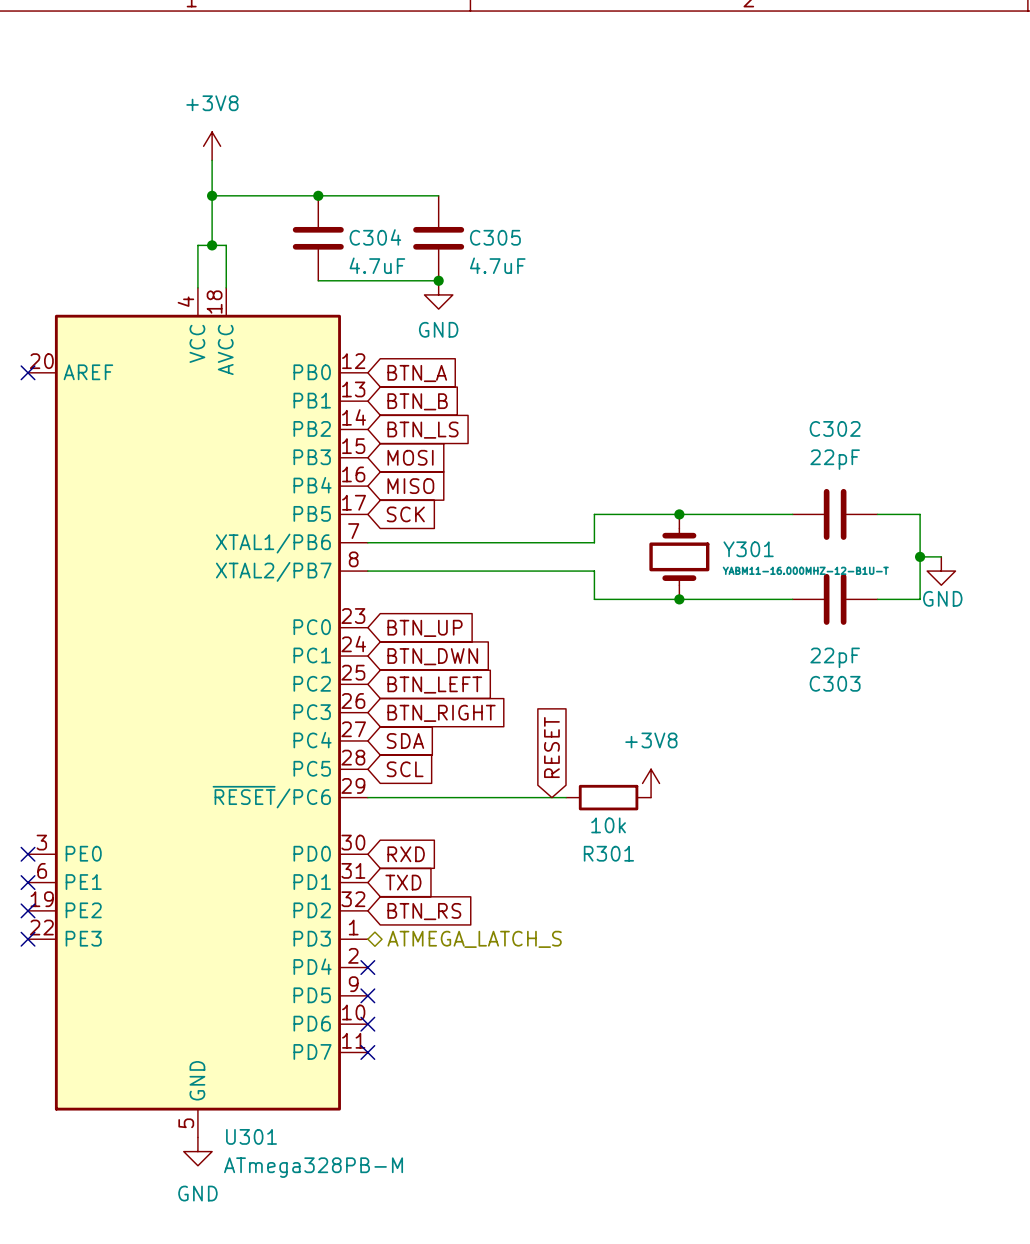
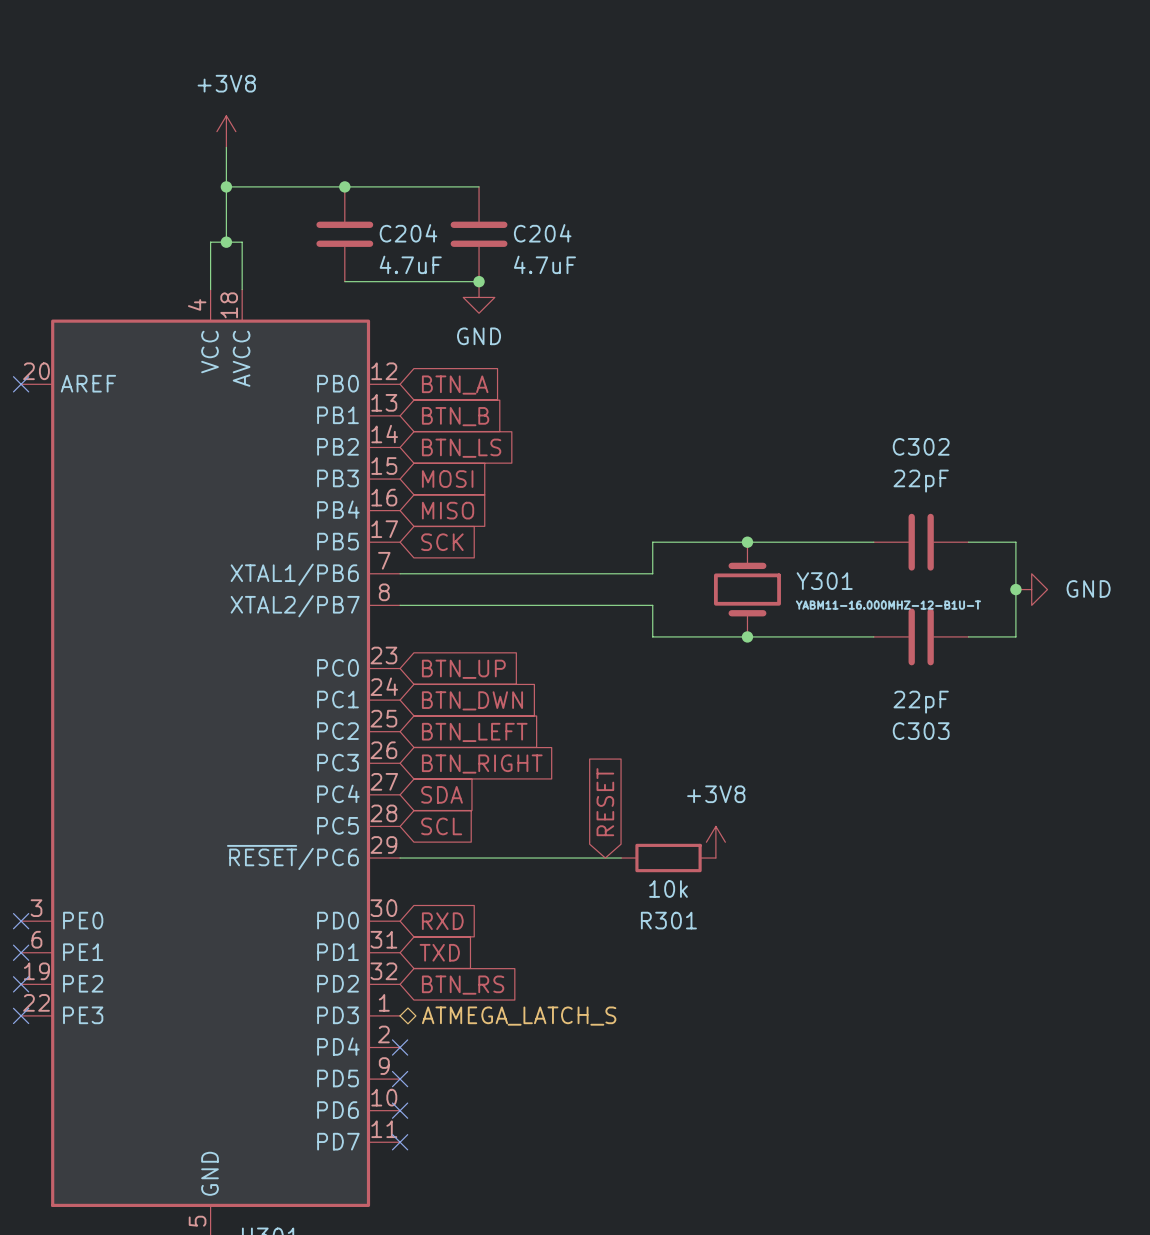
C304 name: C304 (375, 237) -> C204 (408, 233)
C305 name: C305 (495, 237) -> C204 (542, 233)
power symbol rotation: 0° (941, 571) -> 90° counterclockwise (1031, 589)
power symbol text position: GND (942, 598) -> GND (1088, 588)

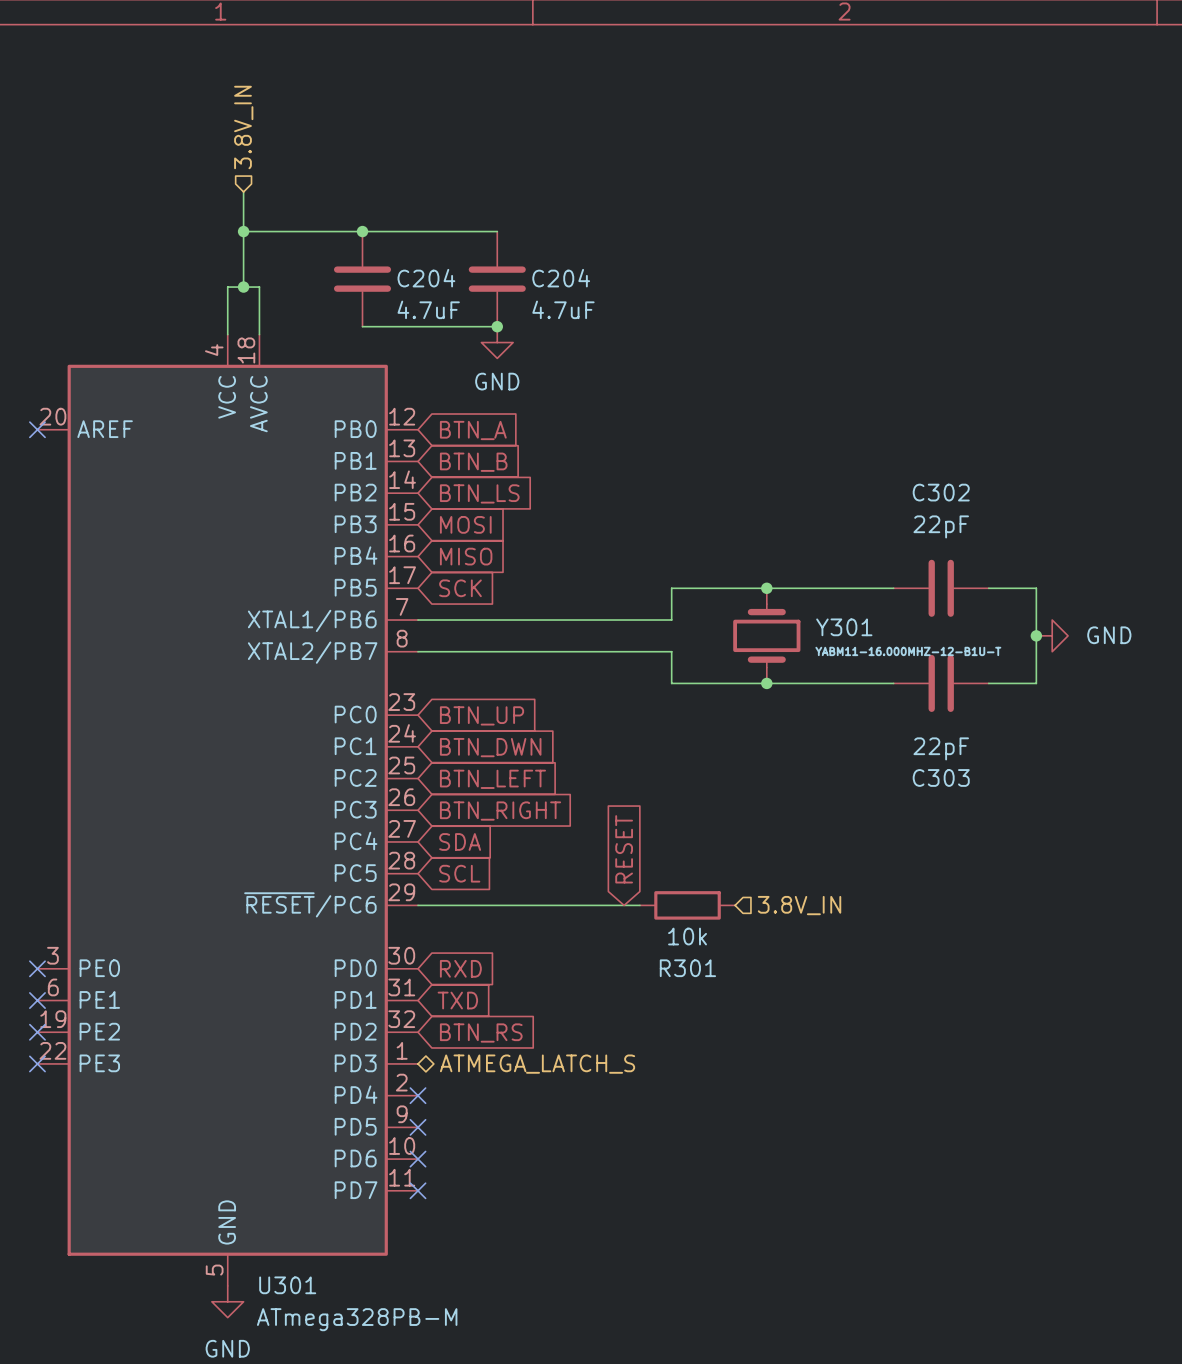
hierarchical label: none -> 3.8V_IN (243, 127)
power symbol: +3V8 (226, 131) -> none
power symbol: +3V8 (715, 842) -> none
hierarchical label: none -> 3.8V_IN (799, 905)

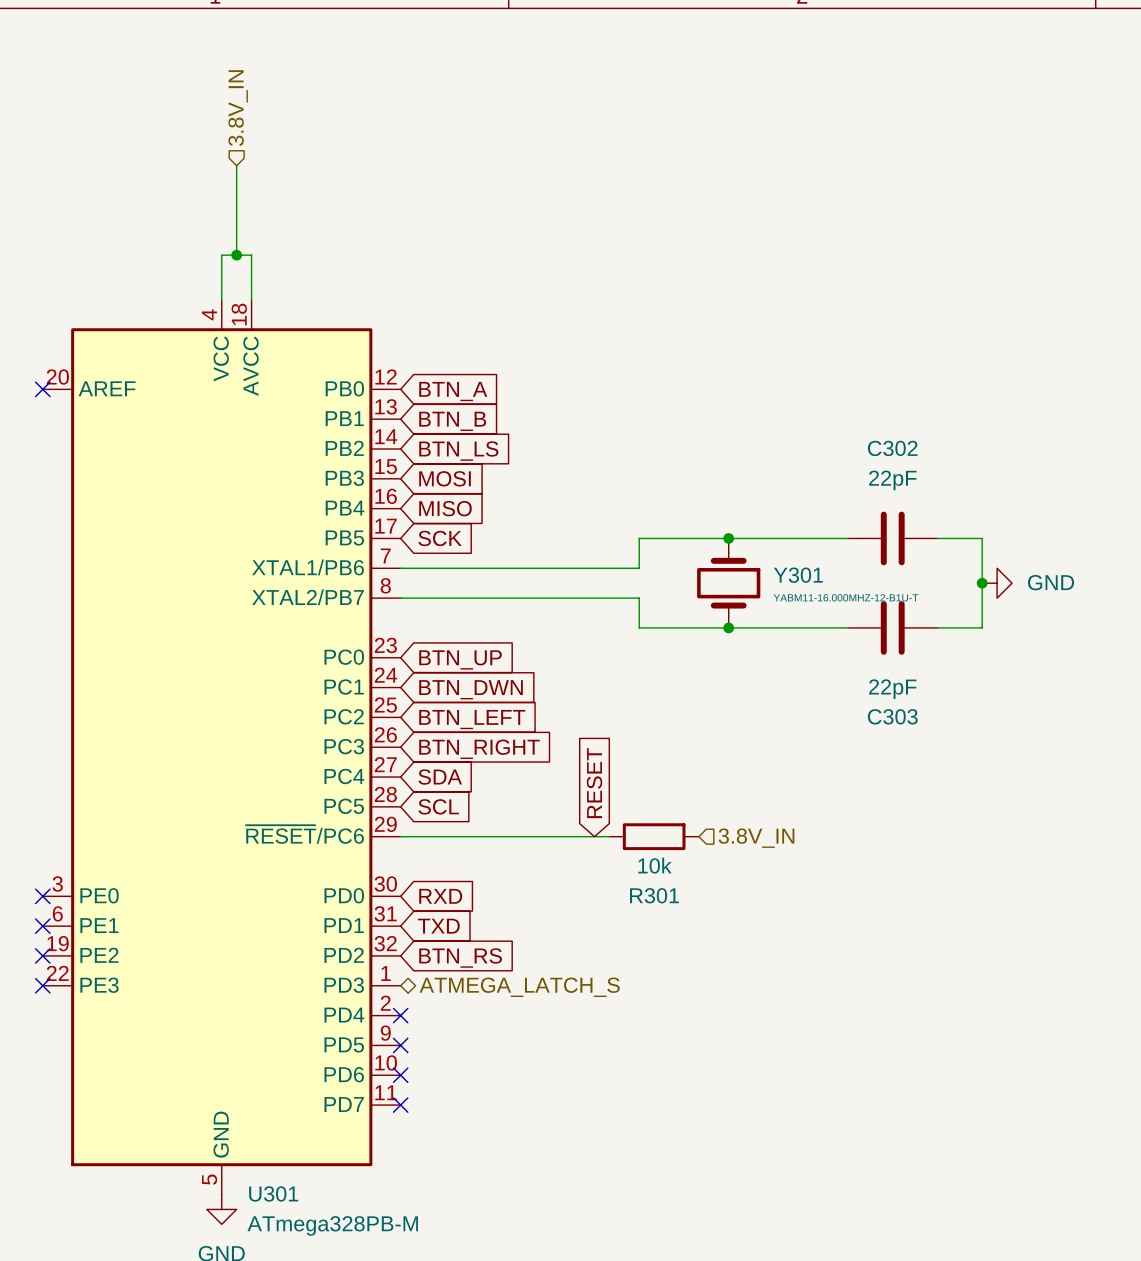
wire: (243, 231) (497, 231) -> none
junction: (243, 231) -> none
junction: (362, 231) -> none
C204: 4.7uF (362, 279) -> none
C204: 4.7uF (497, 279) -> none
wire: (362, 326) (497, 326) -> none
junction: (497, 326) -> none
power symbol: GND (497, 342) -> none

